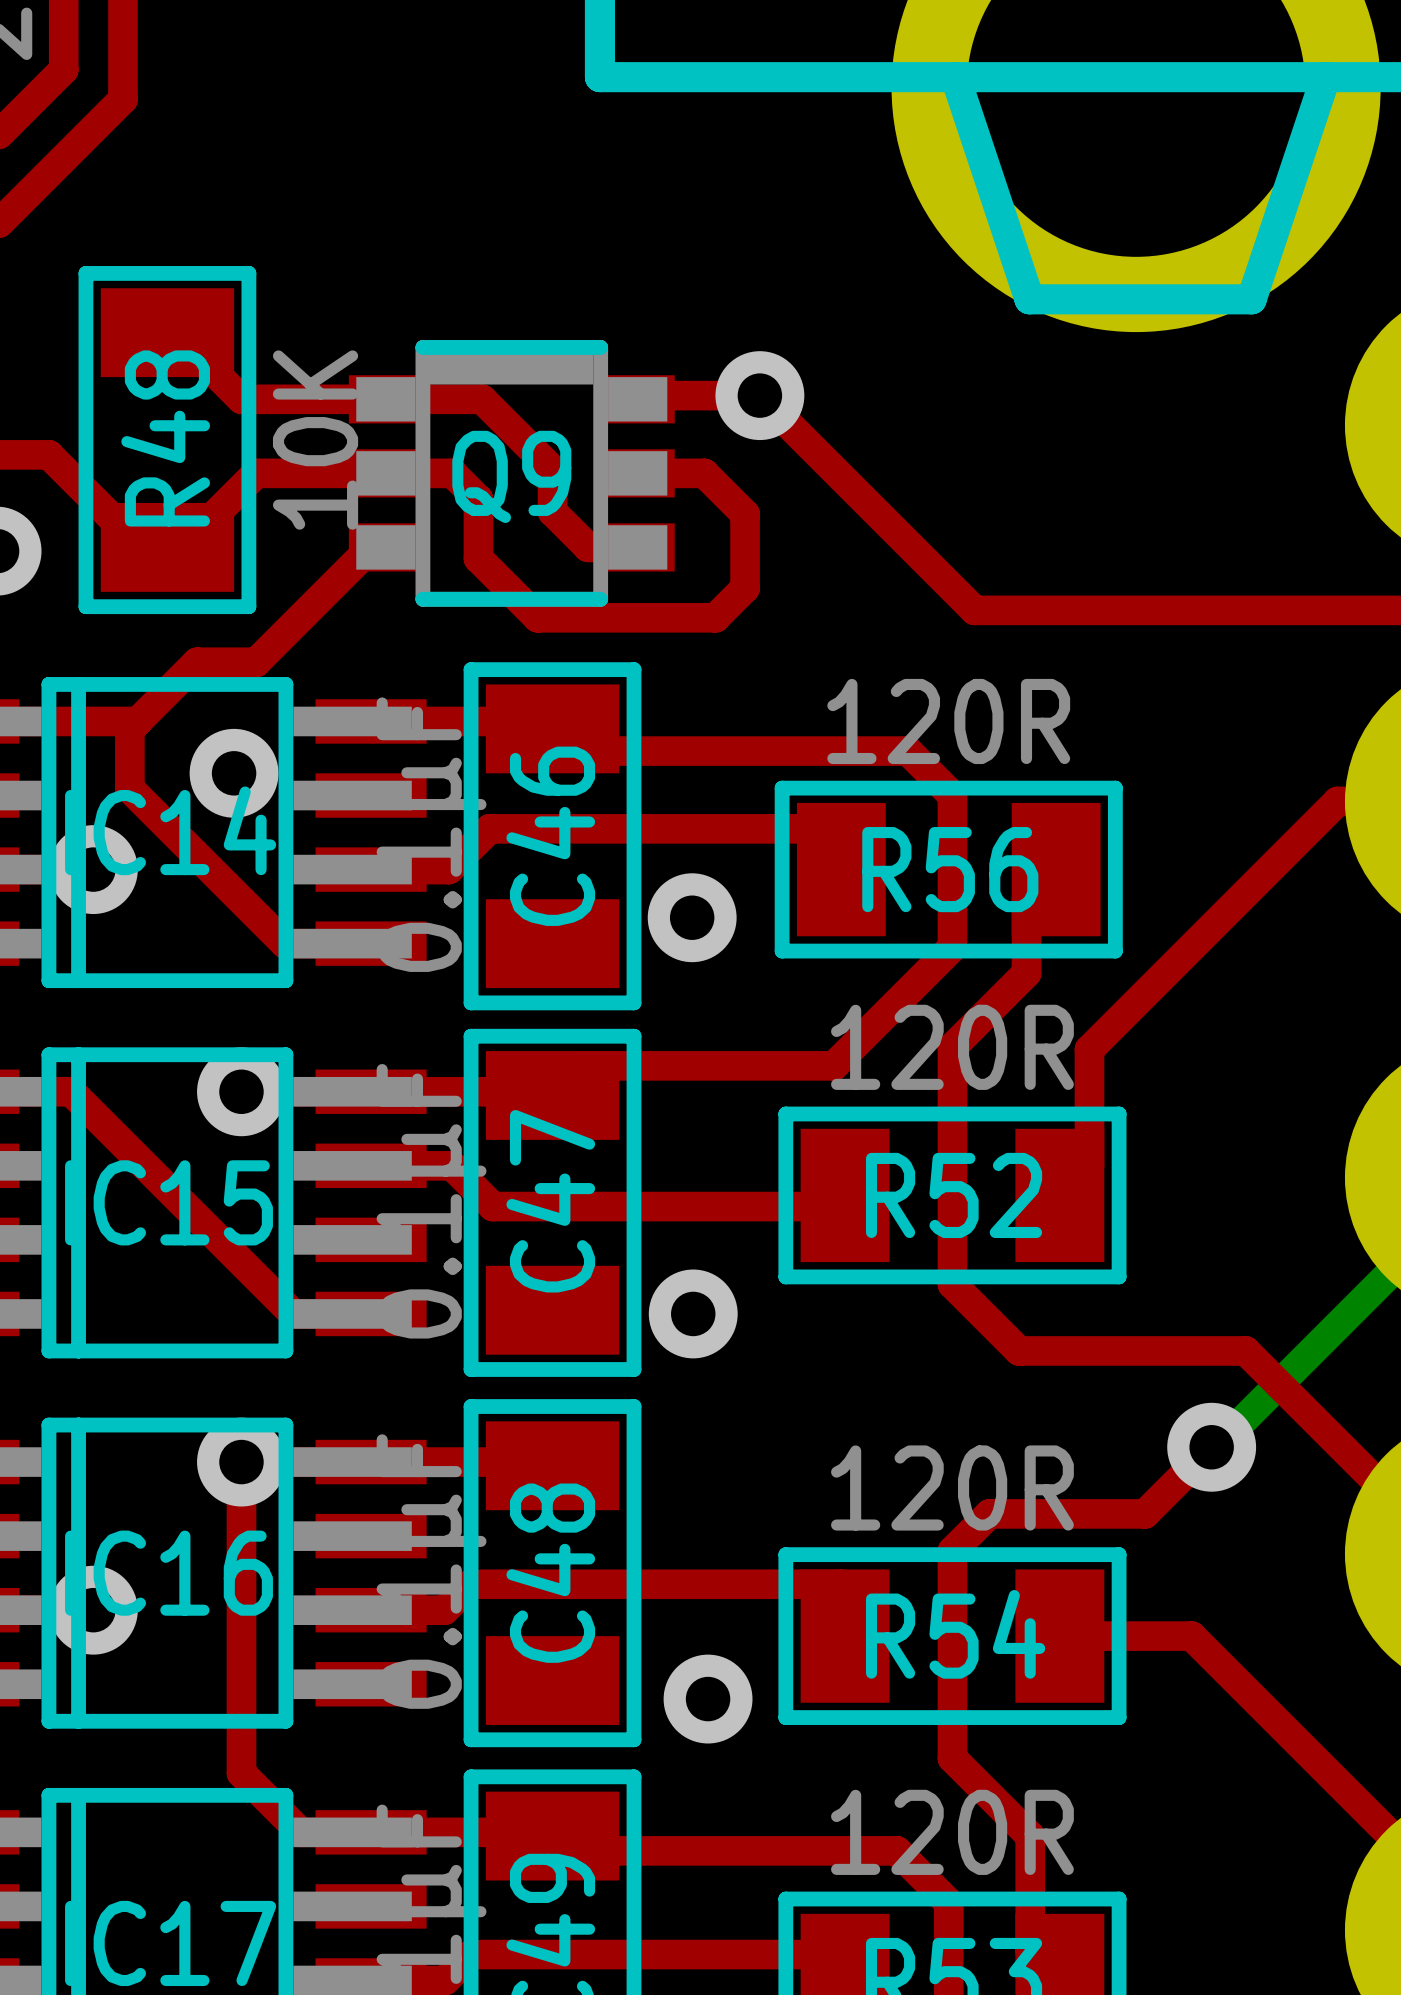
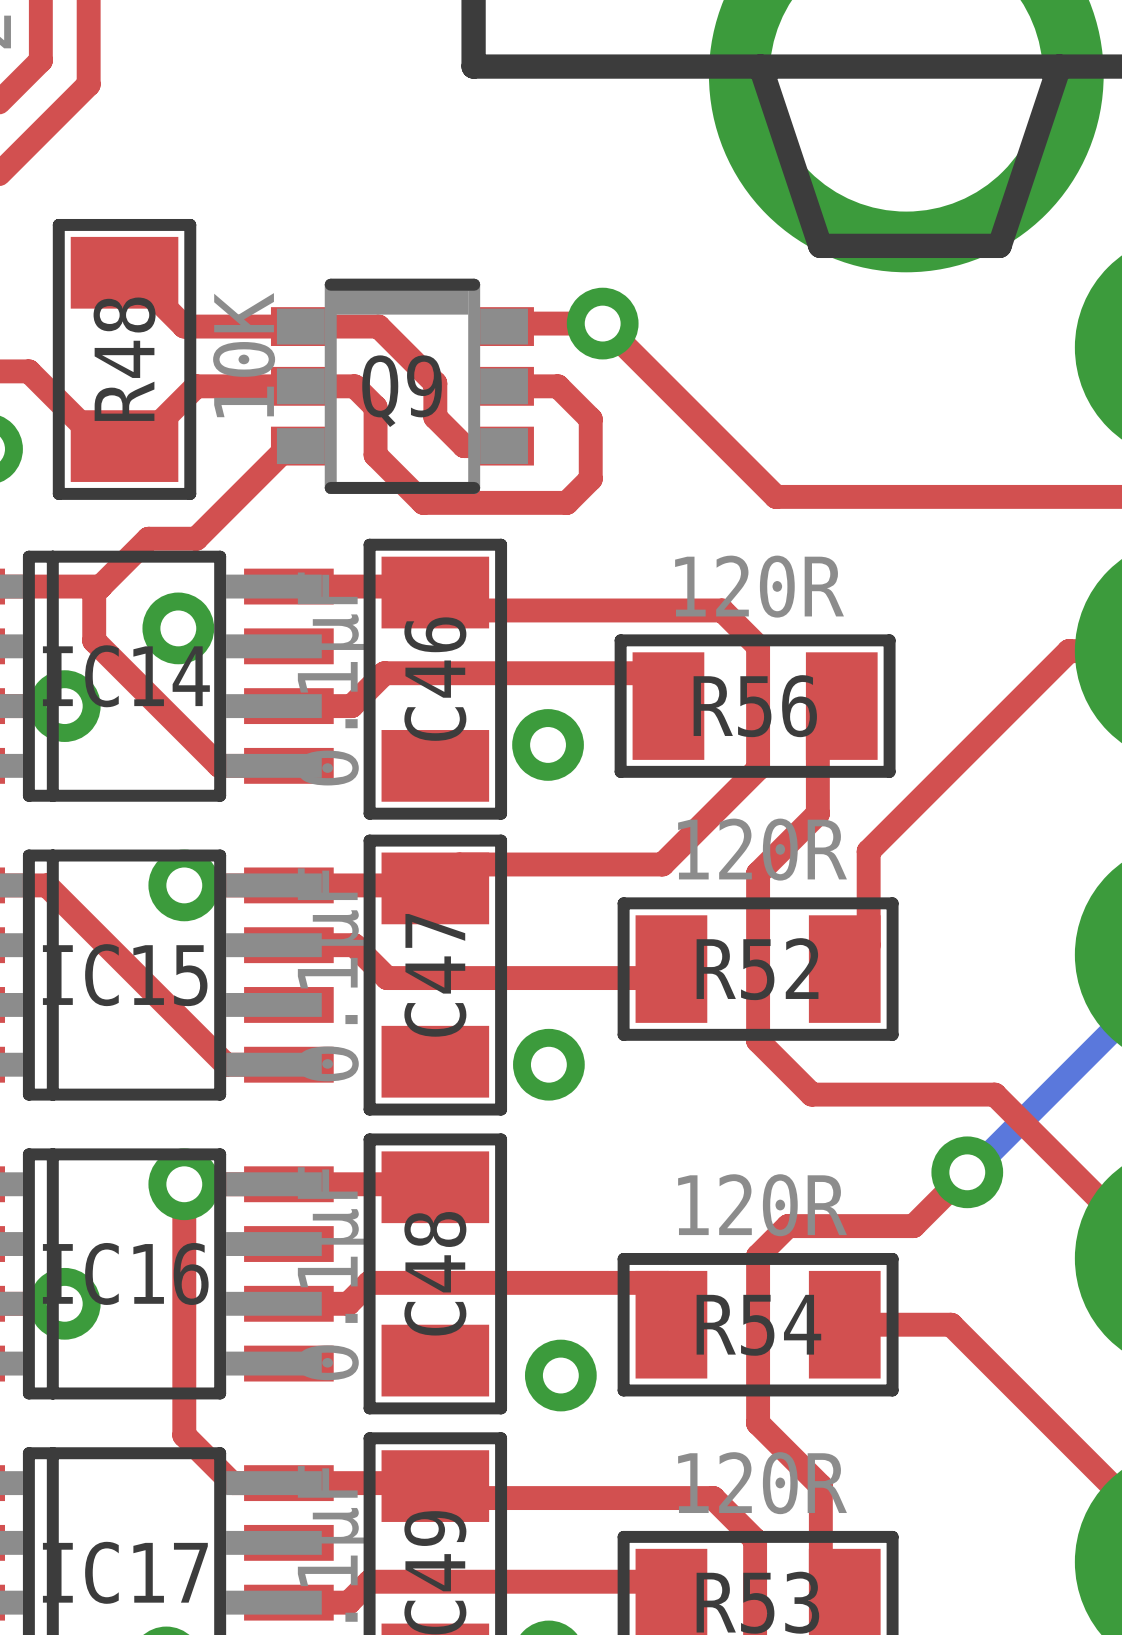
top track: (1026, 973) (952, 1047) (952, 1076) -> (817, 789) (817, 813) (758, 873)

